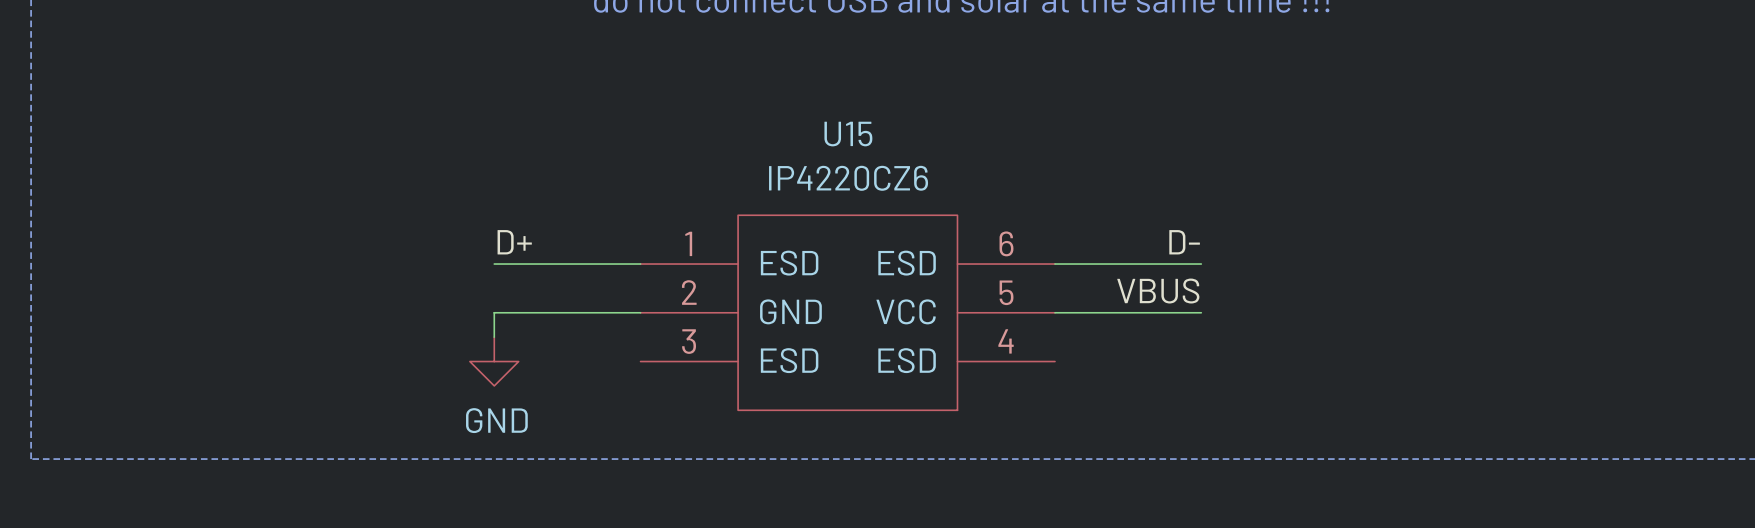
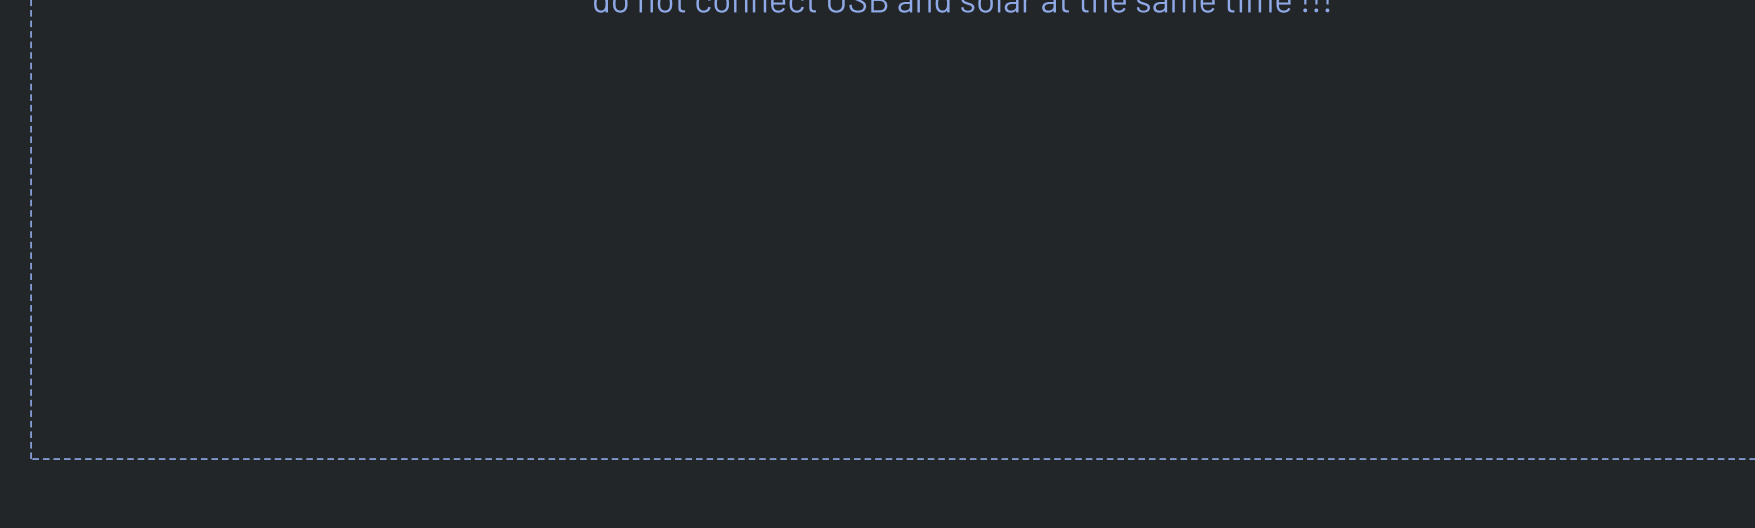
label: D+ (514, 242) -> none
label: D- (1184, 242) -> none
wire: (494, 264) (640, 264) -> none
wire: (1055, 264) (1201, 264) -> none
label: VBUS (1158, 291) -> none
wire: (640, 312) (494, 312) (494, 337) -> none
U15: IP4220CZ6 (847, 312) -> none
wire: (1055, 312) (1201, 312) -> none
power symbol: GND (494, 361) -> none

